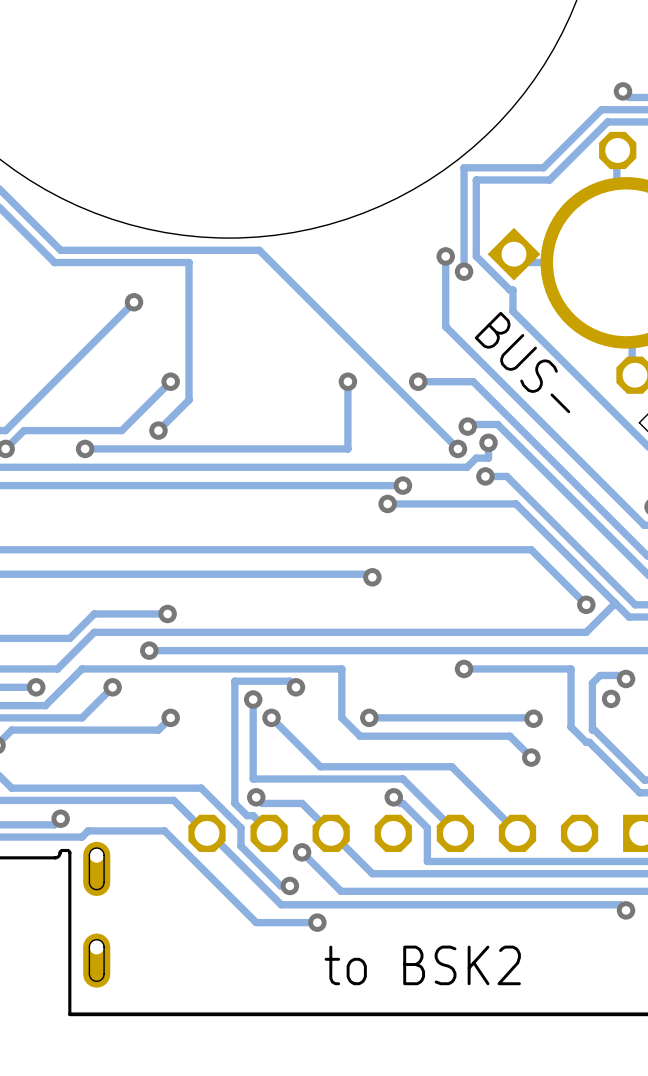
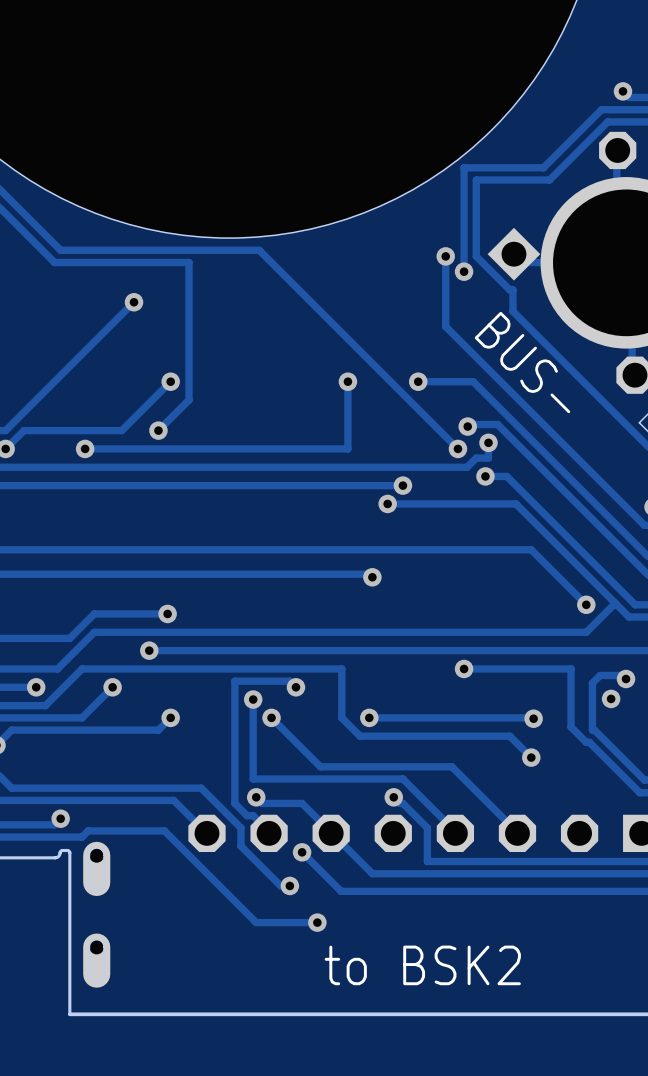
track: (206, 833) (210, 834) (281, 904) (620, 904) (626, 910) -> none
via: (626, 910) -> none

